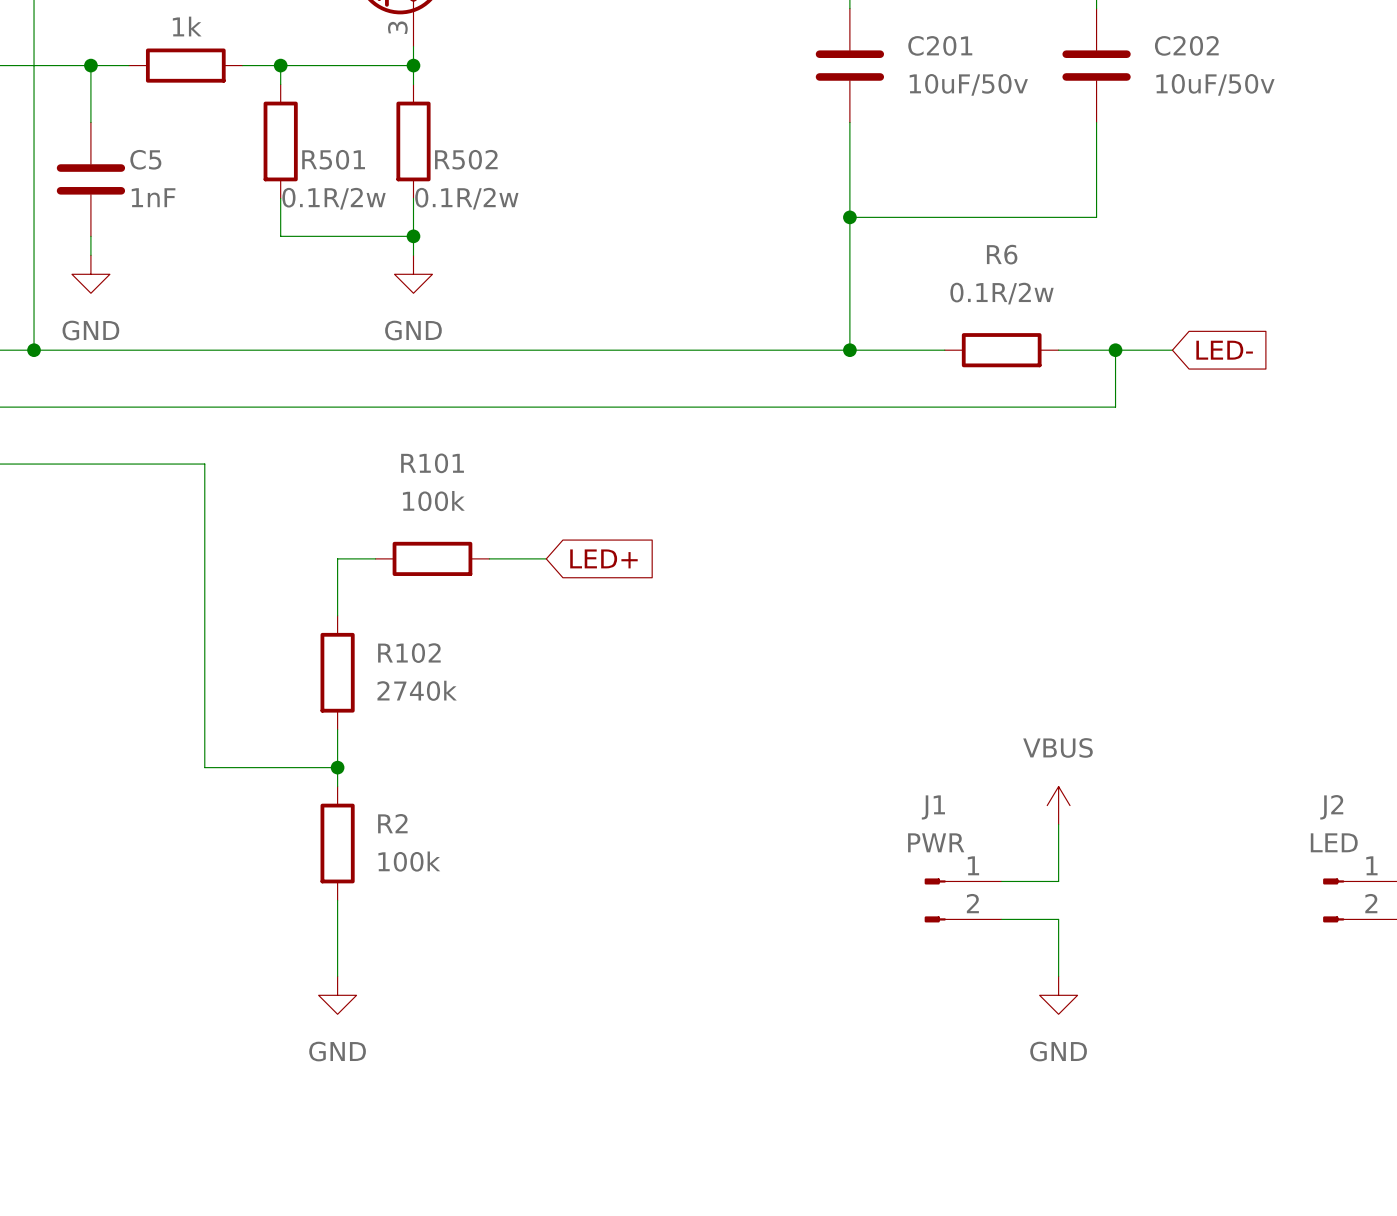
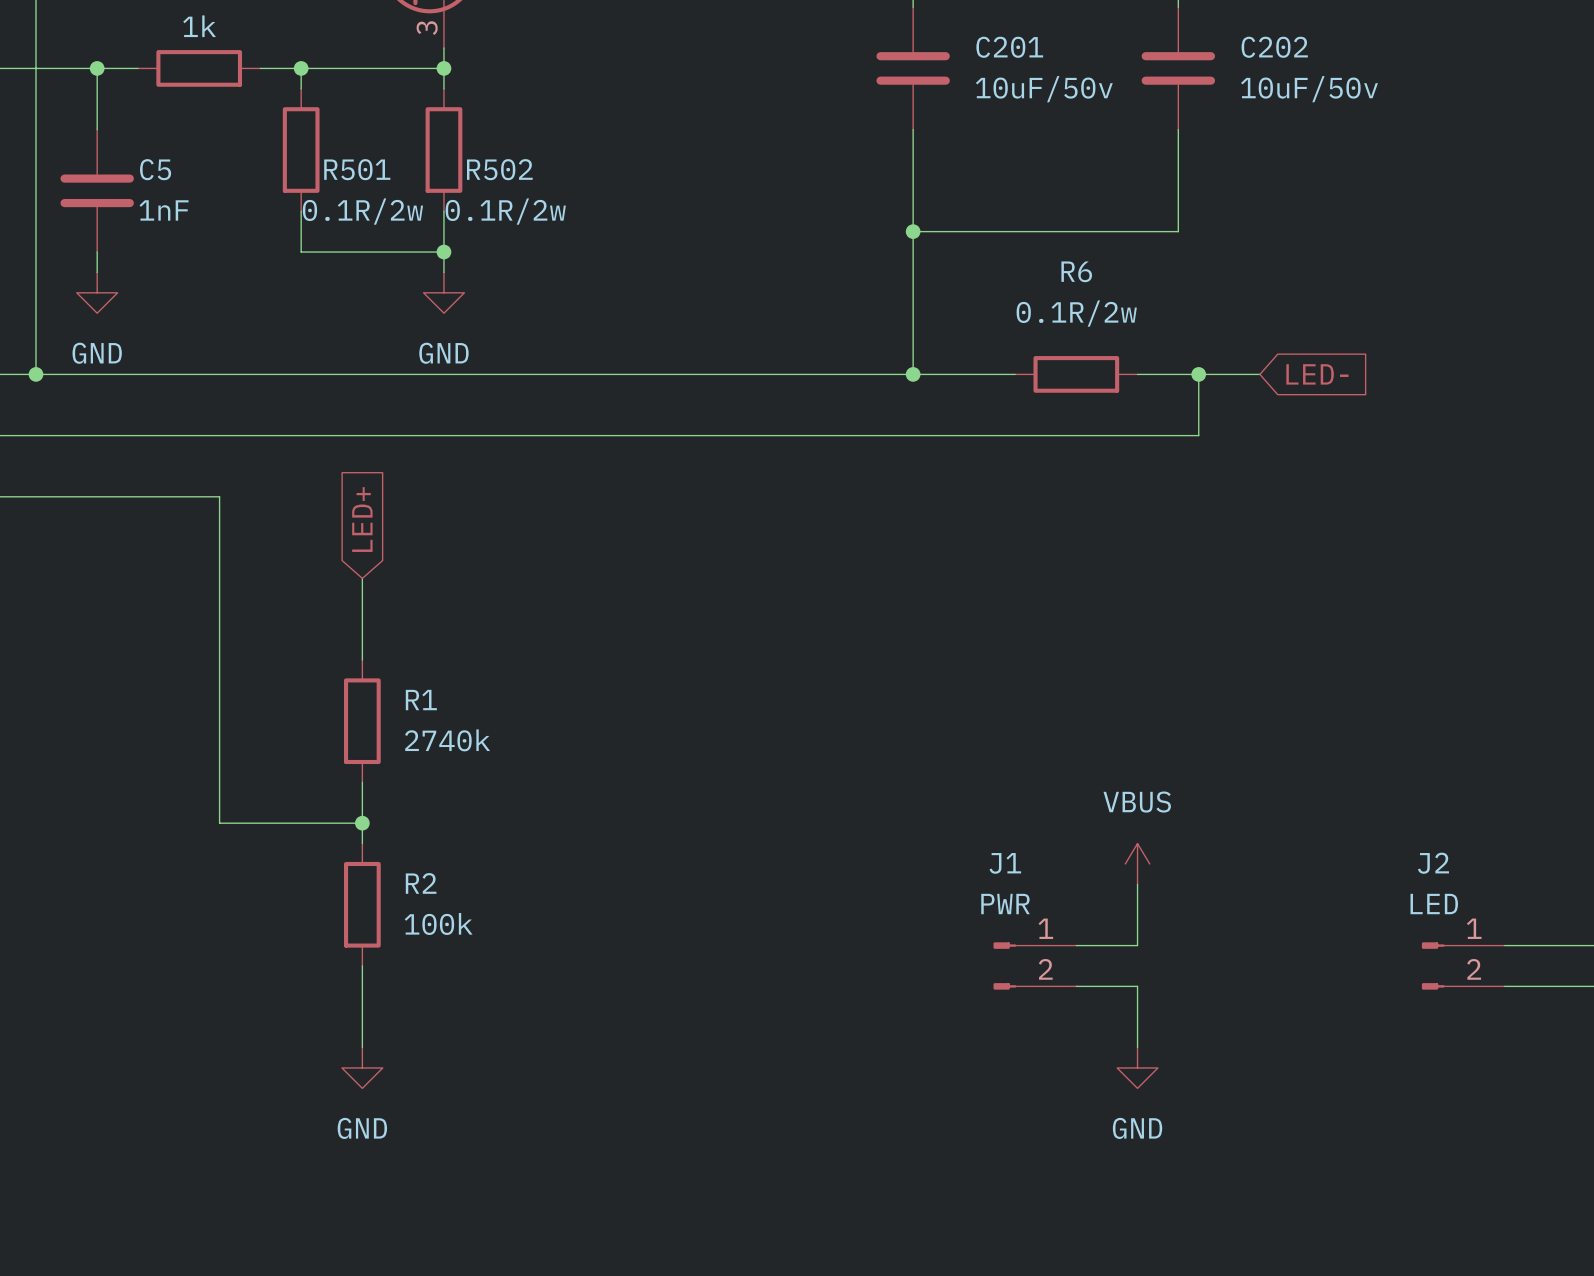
wire: (337, 558) (375, 558) -> (362, 598) (362, 578)
R101: 100k (432, 558) -> none
wire: (489, 558) (546, 558) -> none
global label rotation: 0° (603, 558) -> 90° counterclockwise (362, 519)
global label position: LED+ (603, 558) -> LED+ (362, 519)
R102 name: R102 (409, 653) -> R1 (421, 700)

